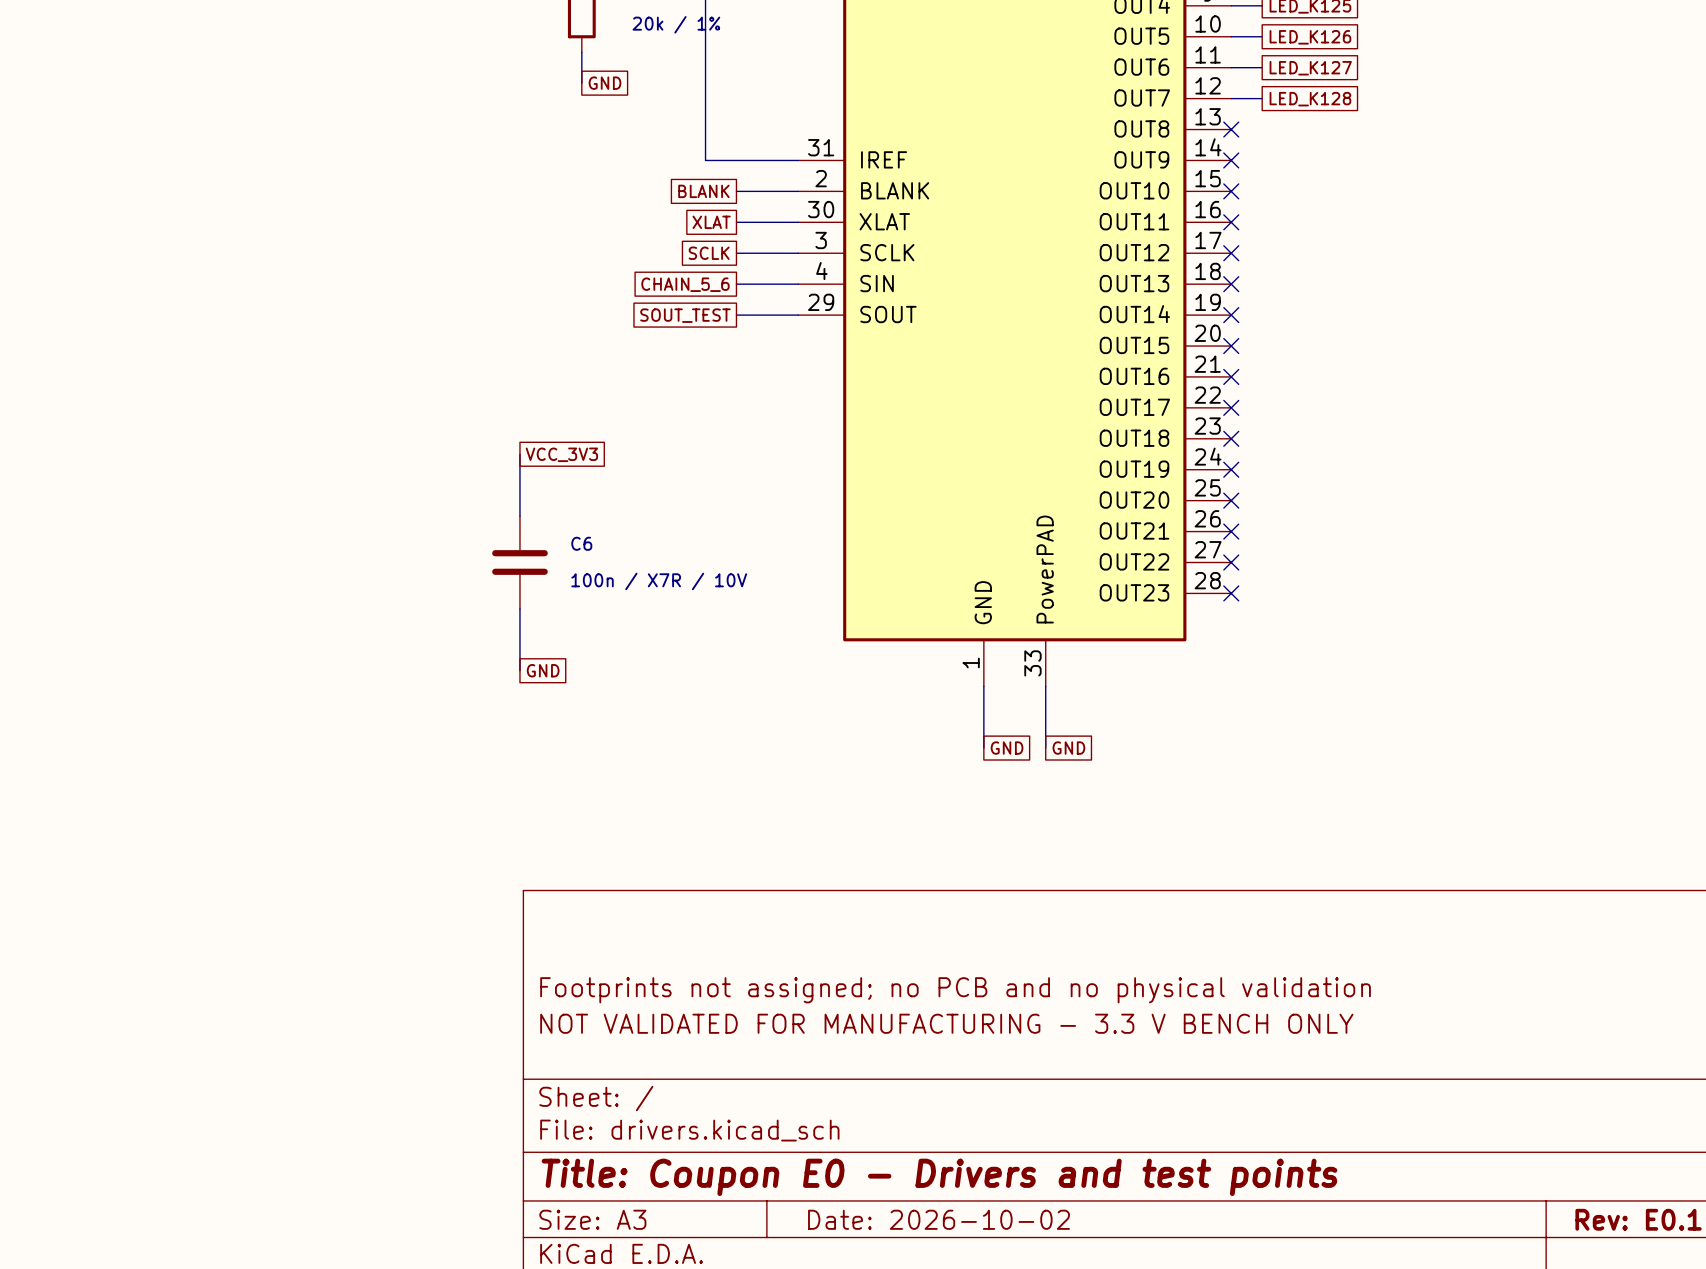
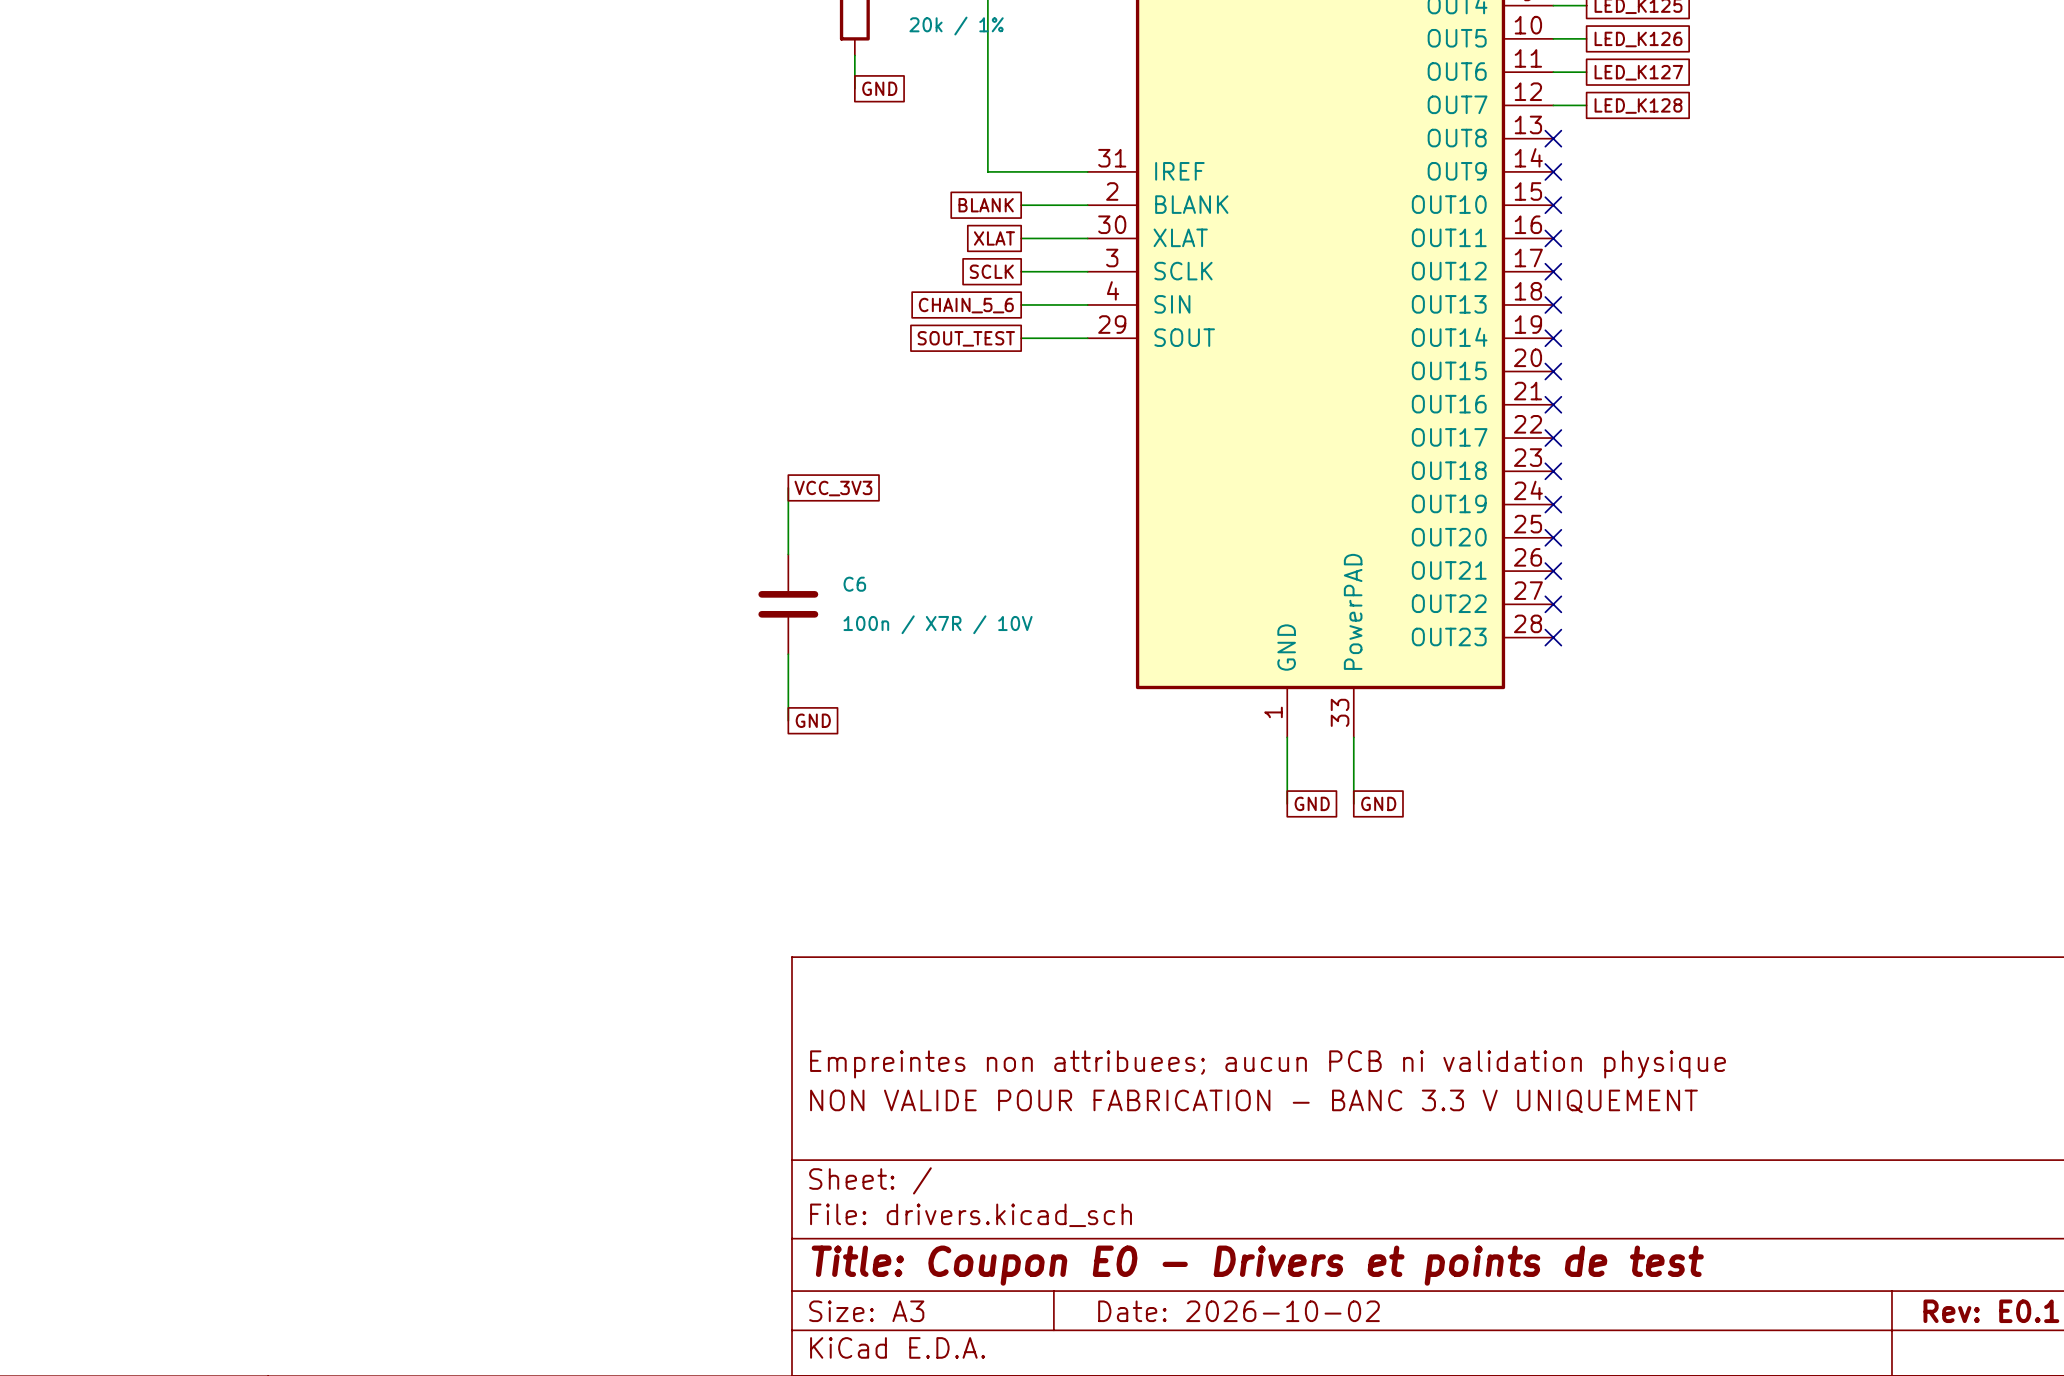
title block: Footprints not assigned; no PCB and no physical validation (955, 990) -> Empreintes non attribuees; aucun PCB ni validation physique (1268, 1064)
title block: NOT VALIDATED FOR MANUFACTURING - 3.3 V BENCH ONLY (946, 1023) -> NON VALIDE POUR FABRICATION - BANC 3.3 V UNIQUEMENT (1253, 1101)
title block: Title: Coupon E0 - Drivers and test points (939, 1177) -> Title: Coupon E0 - Drivers et points de test (1257, 1265)

